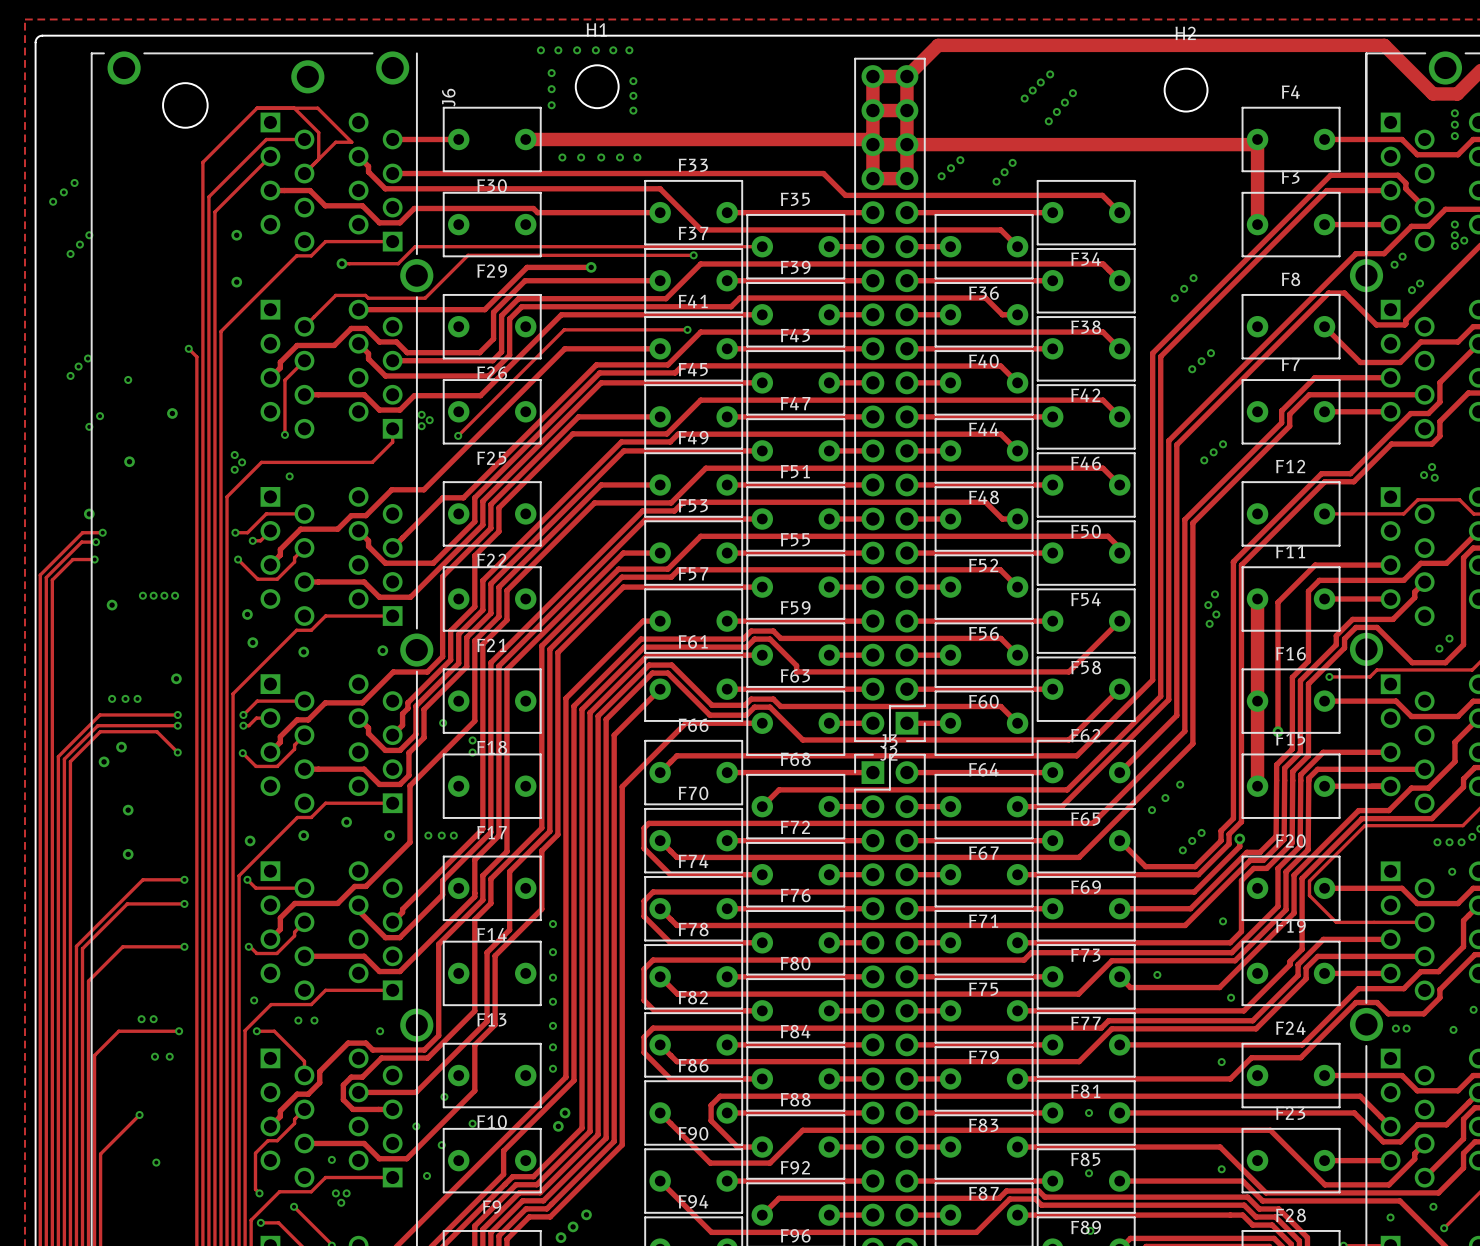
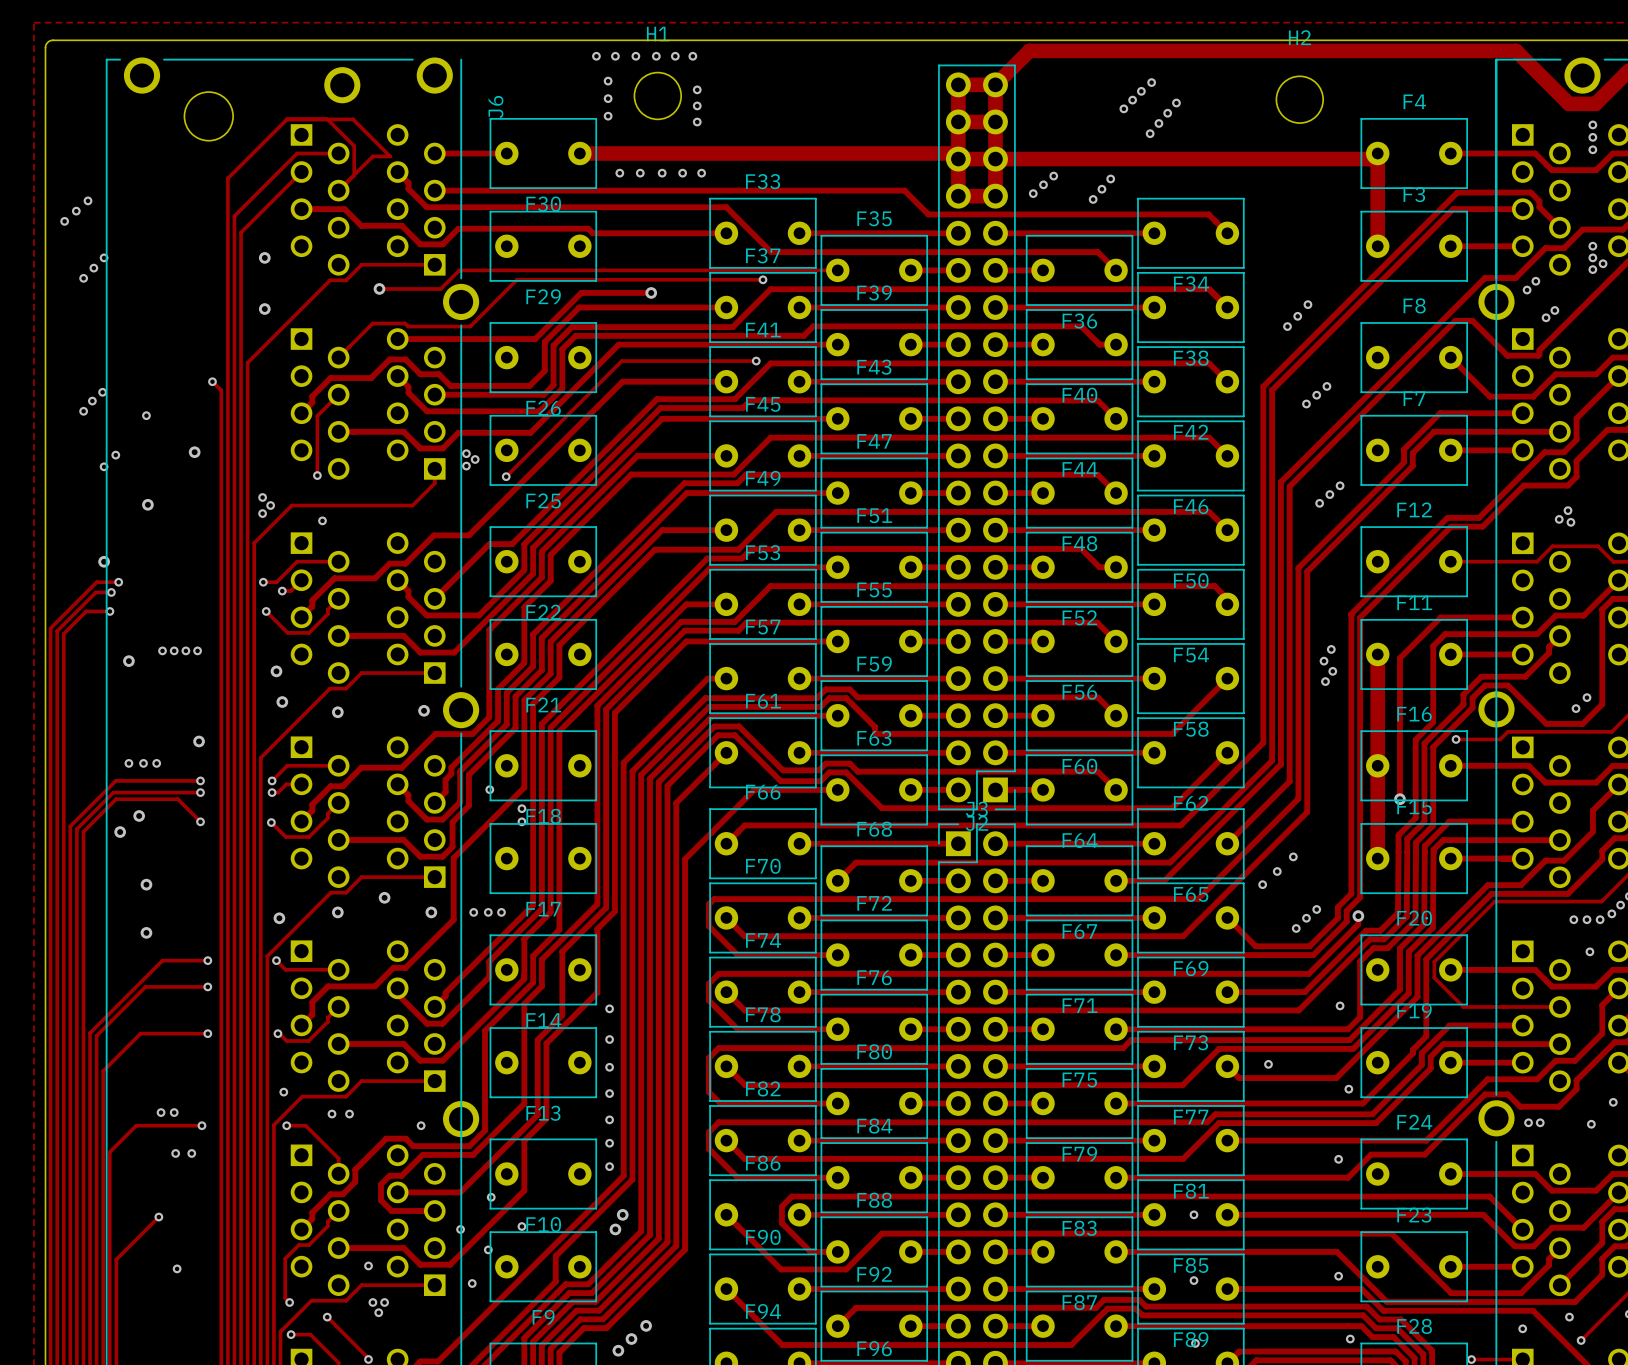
via: none -> (1350, 1339)

